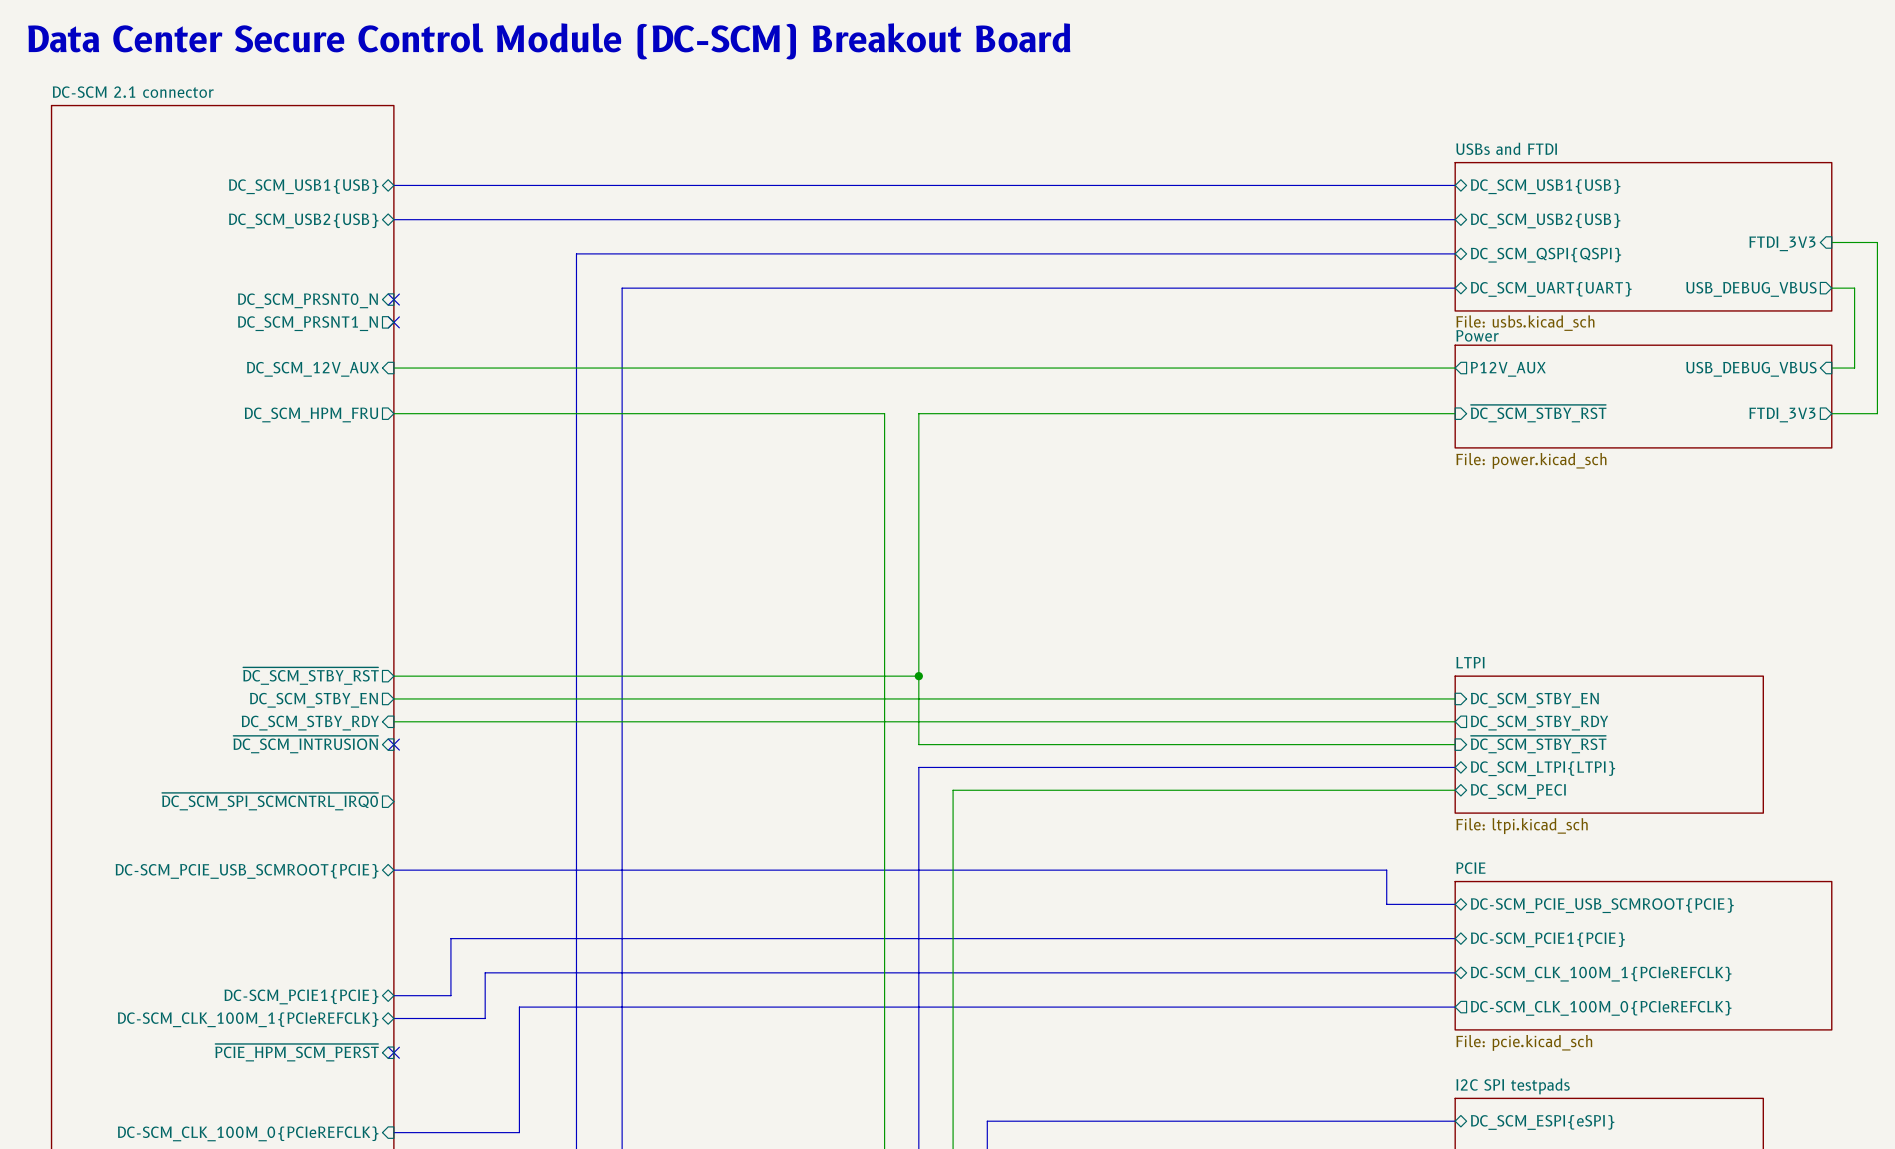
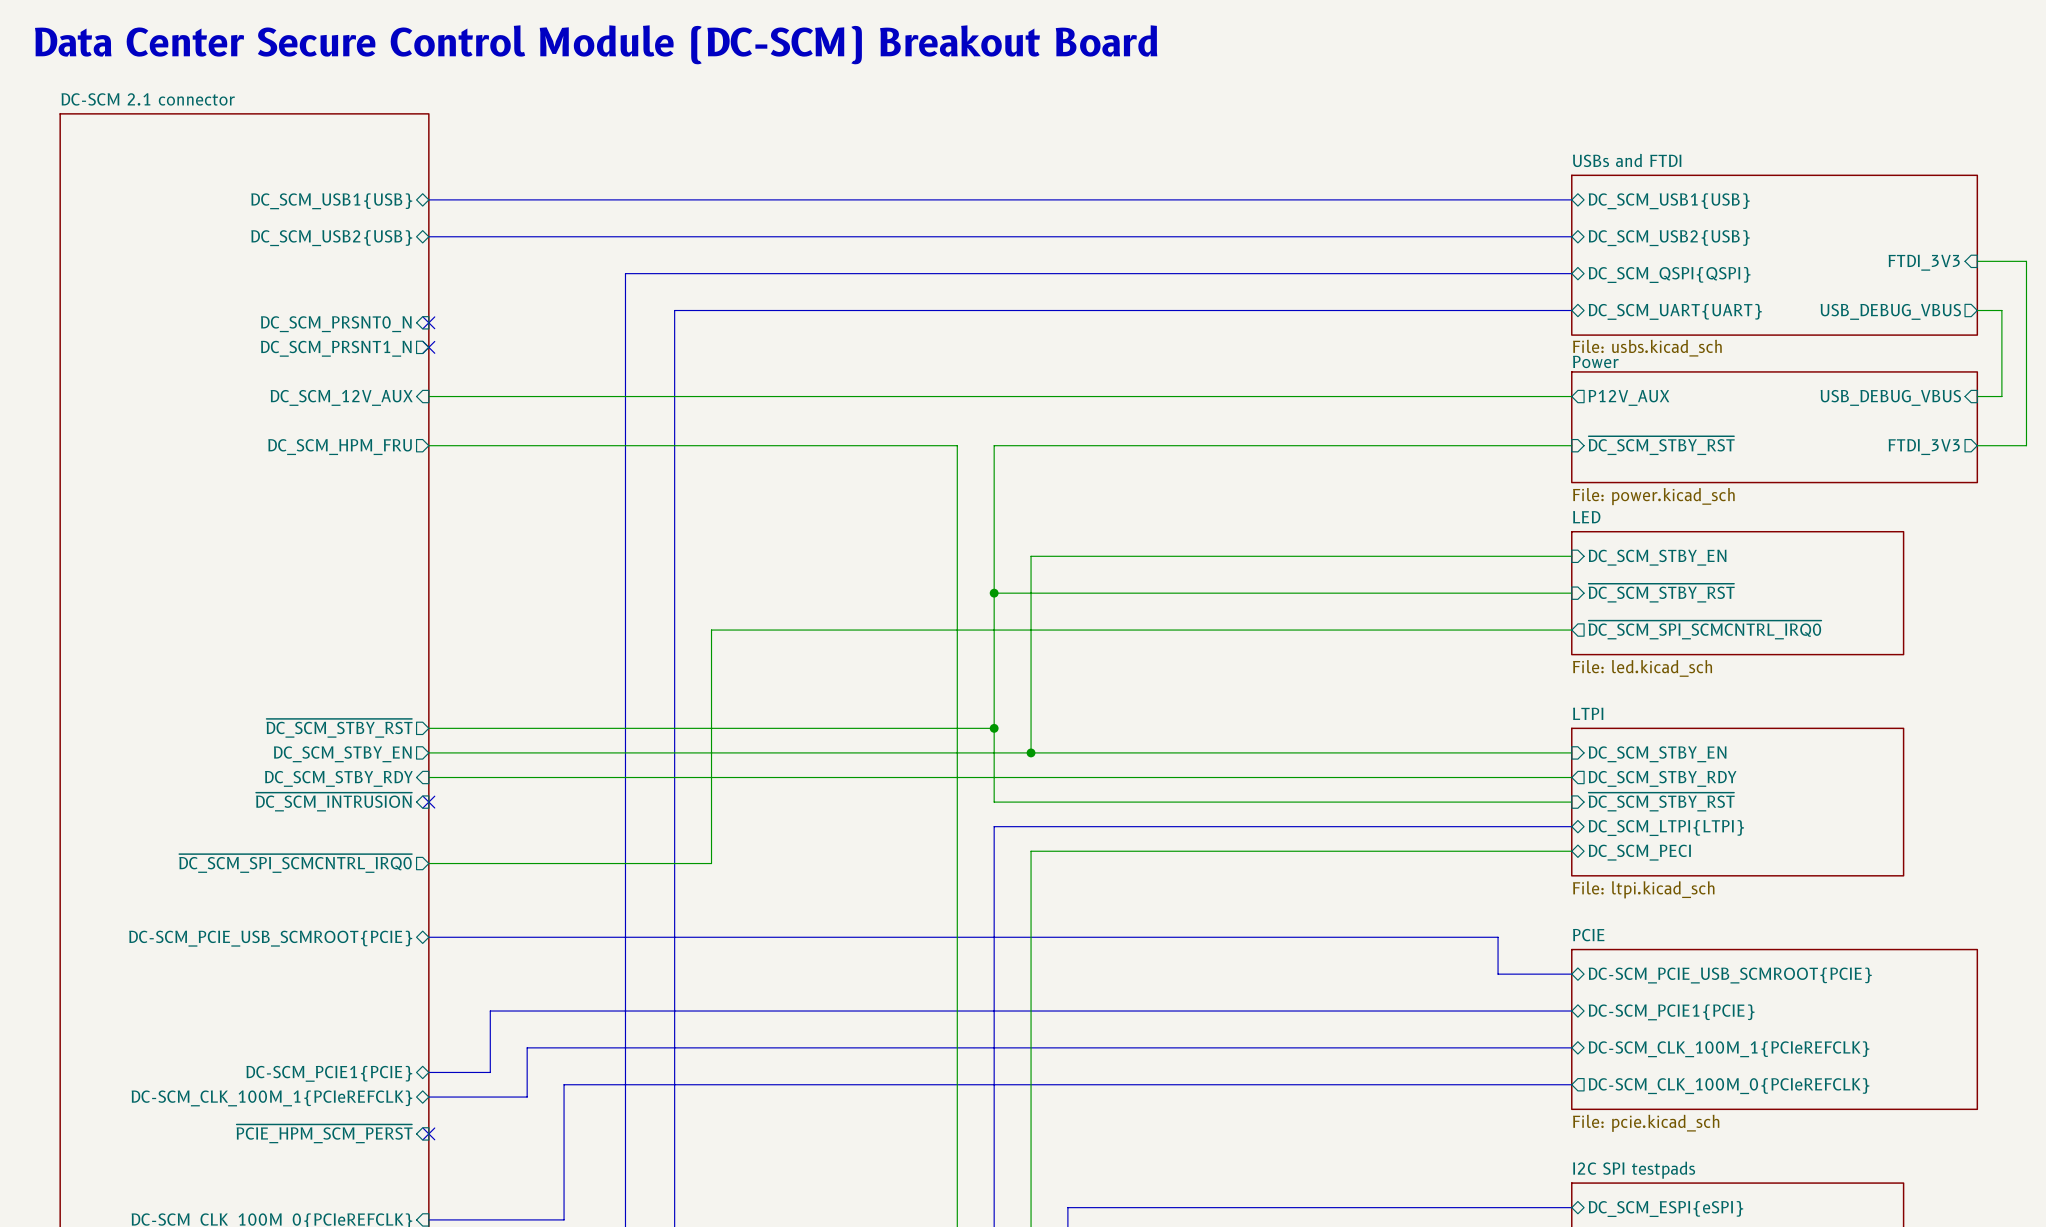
wire: none -> (1571, 556) (1031, 556) (1031, 752)
sheet pin: none -> DC_SCM_STBY_EN (1657, 557)
wire: none -> (994, 593) (1571, 593)
junction: none -> (994, 593)
sheet pin: none -> ~{DC_SCM_STBY_RST} (1661, 593)
sheet LED: none -> File: led.kicad_sch (1737, 593)
wire: none -> (1571, 630) (711, 630) (711, 863) (428, 863)
sheet pin: none -> ~{DC_SCM_SPI_SCMCNTRL_IRQ0} (1705, 630)
junction: none -> (1031, 752)

